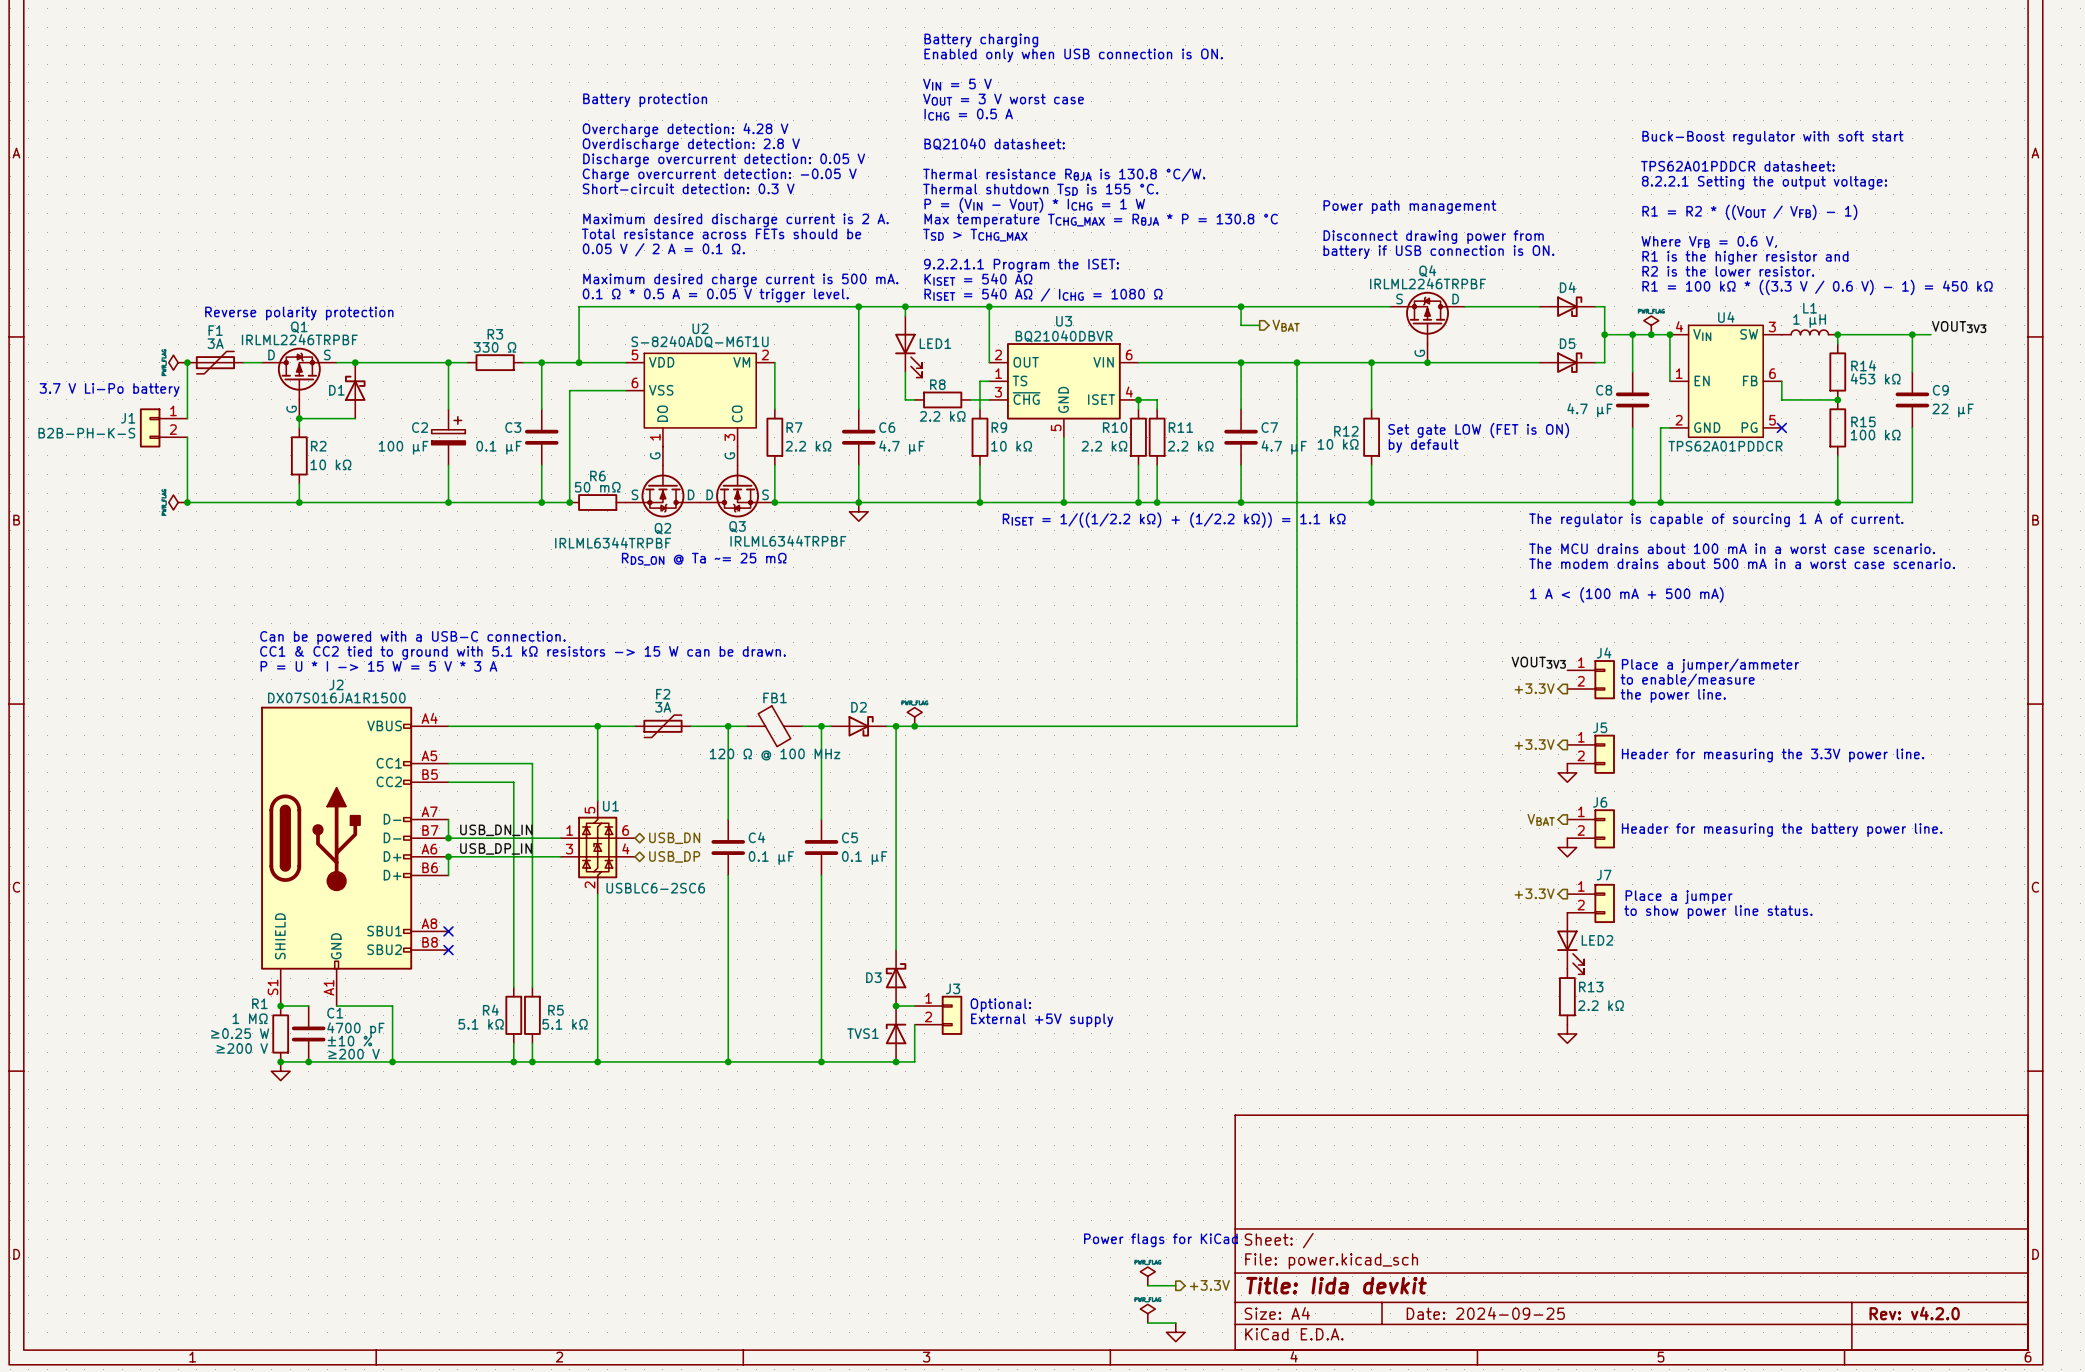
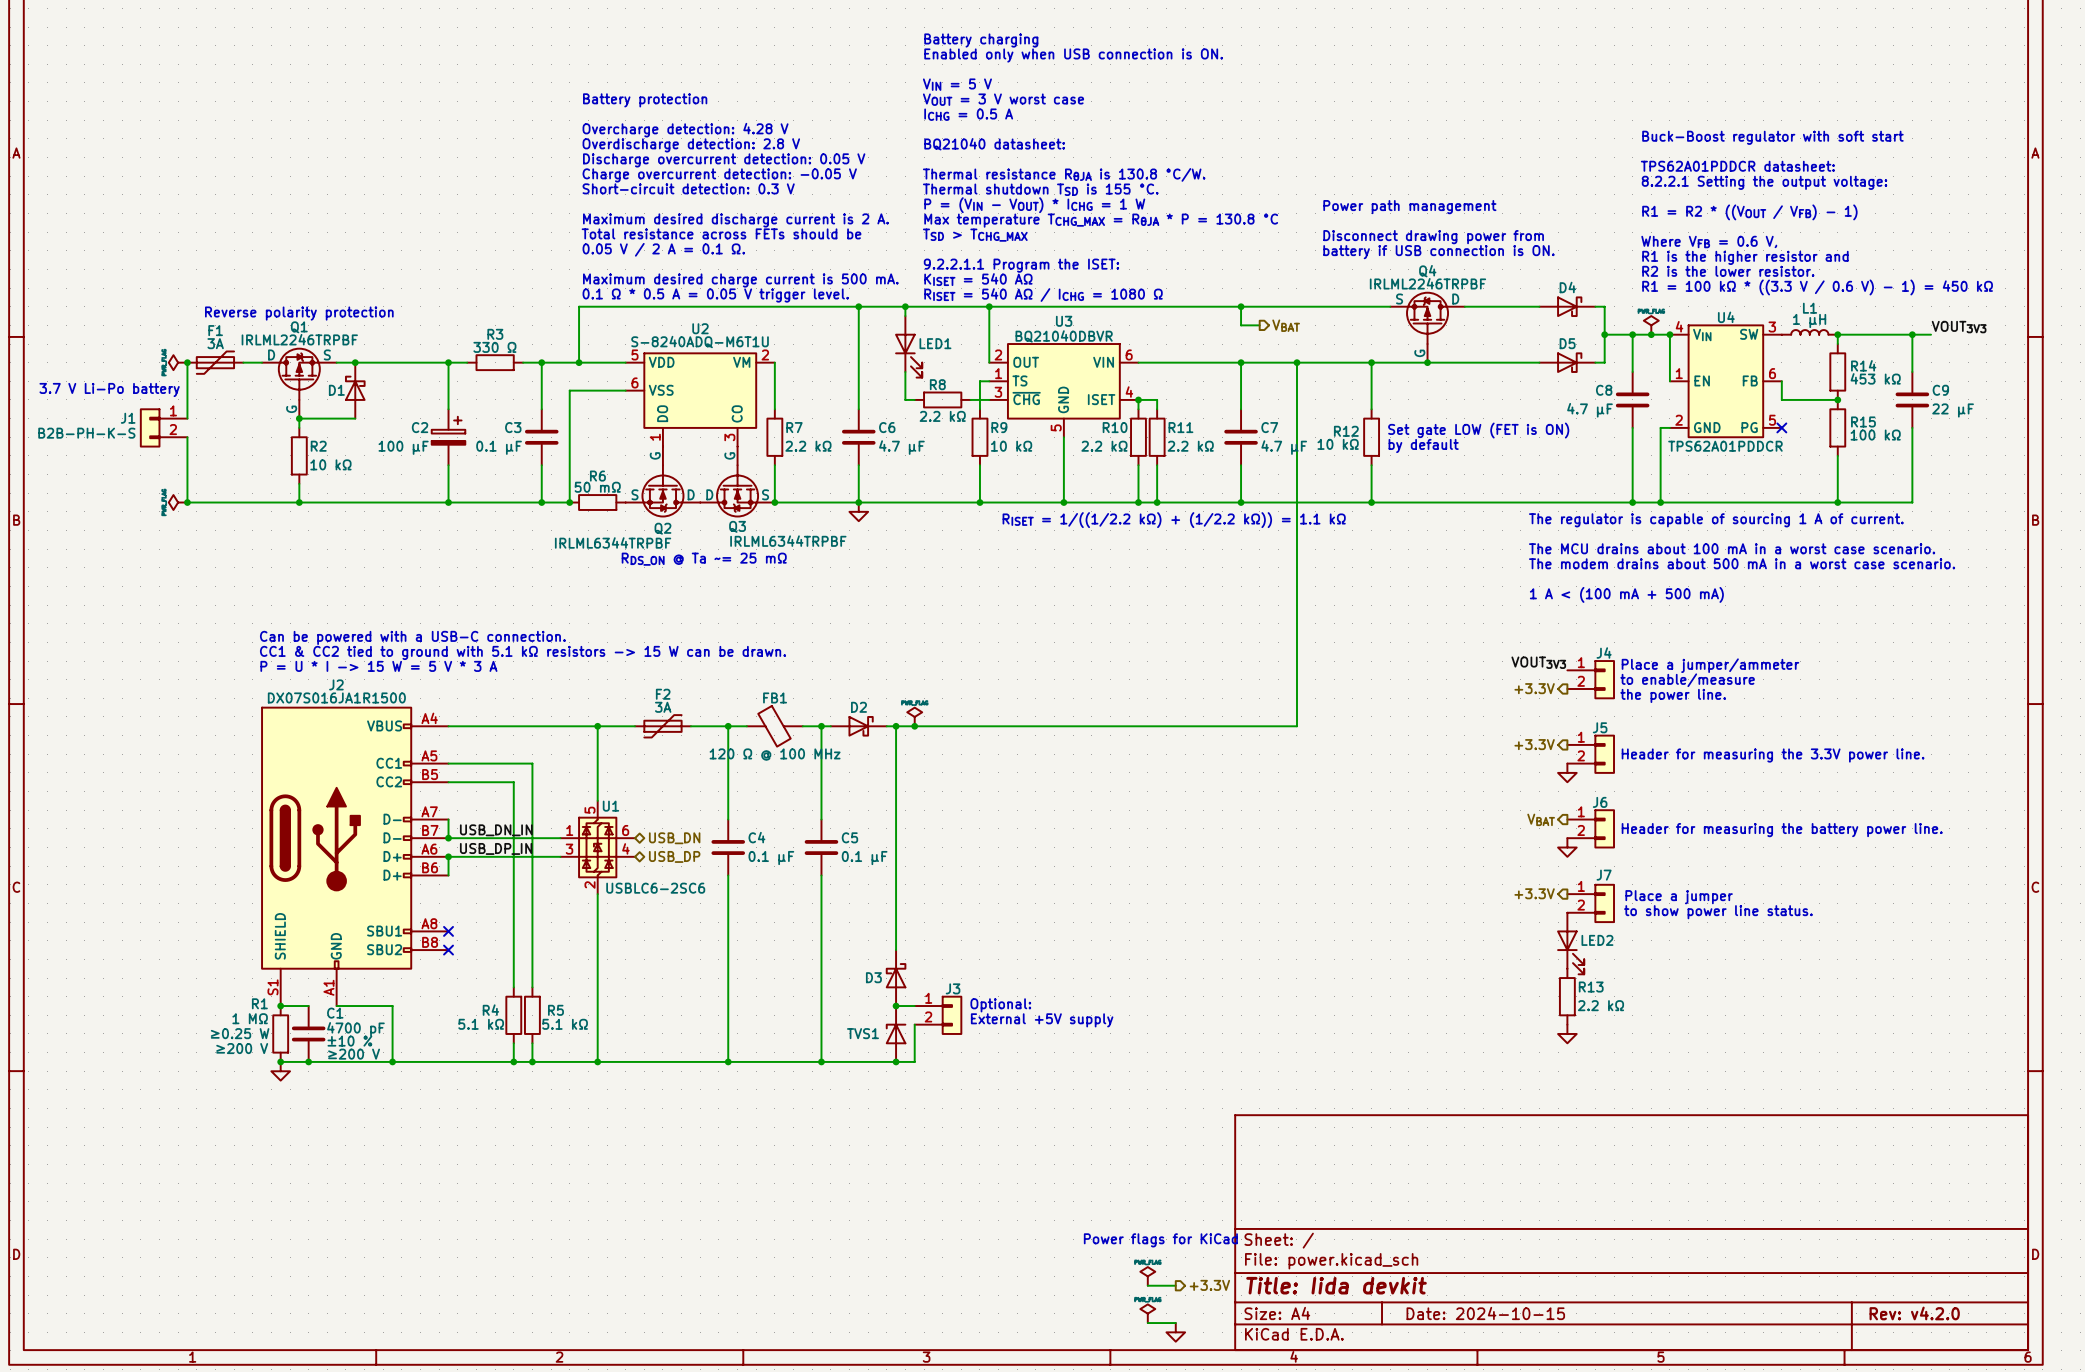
title block: Date: 2024-09-25 (1485, 1313) -> Date: 2024-10-15 (1485, 1313)

